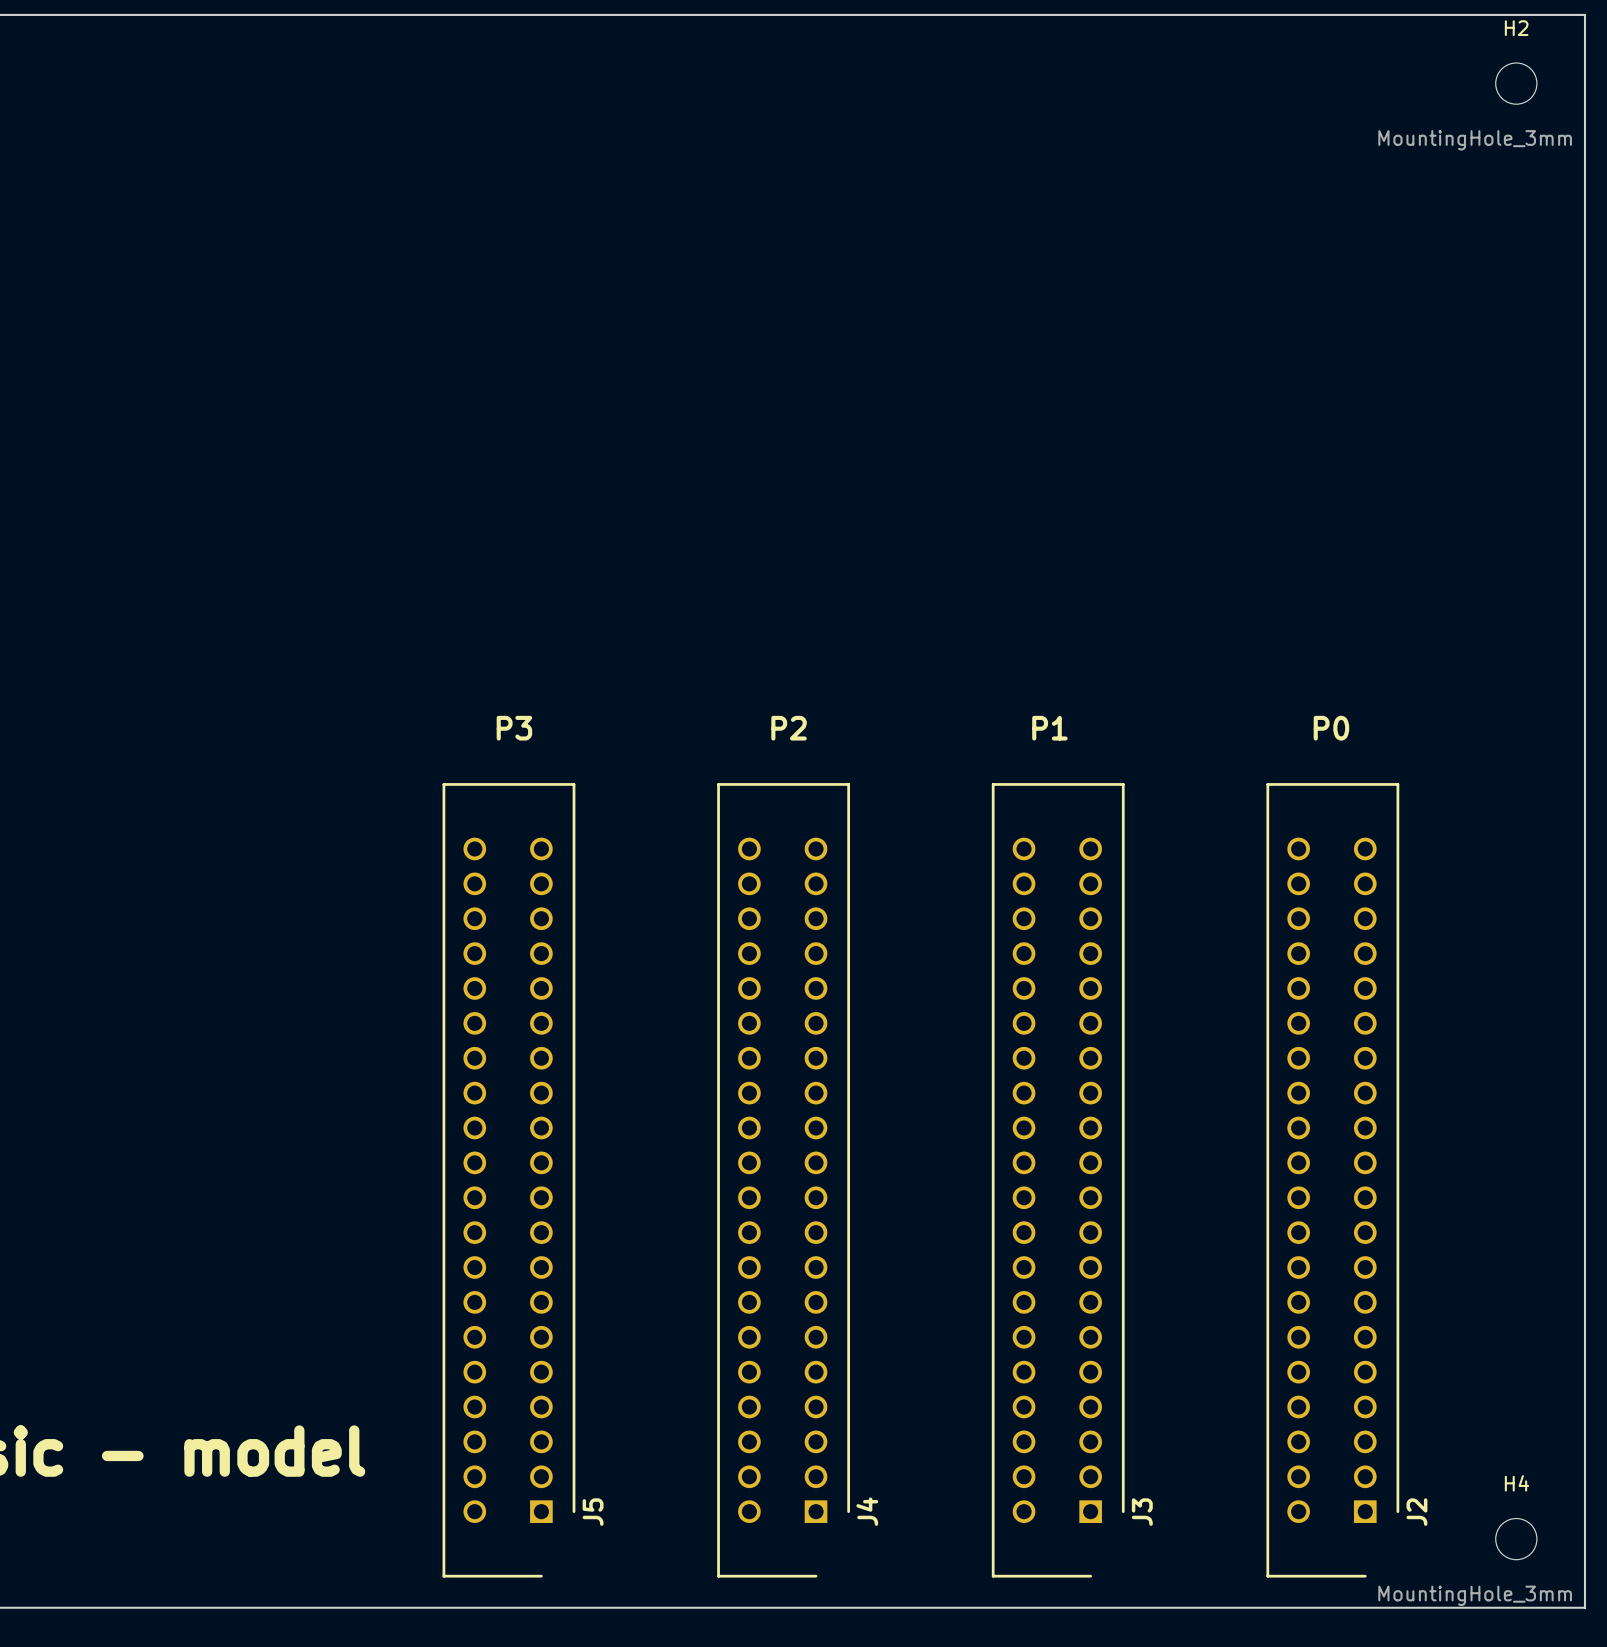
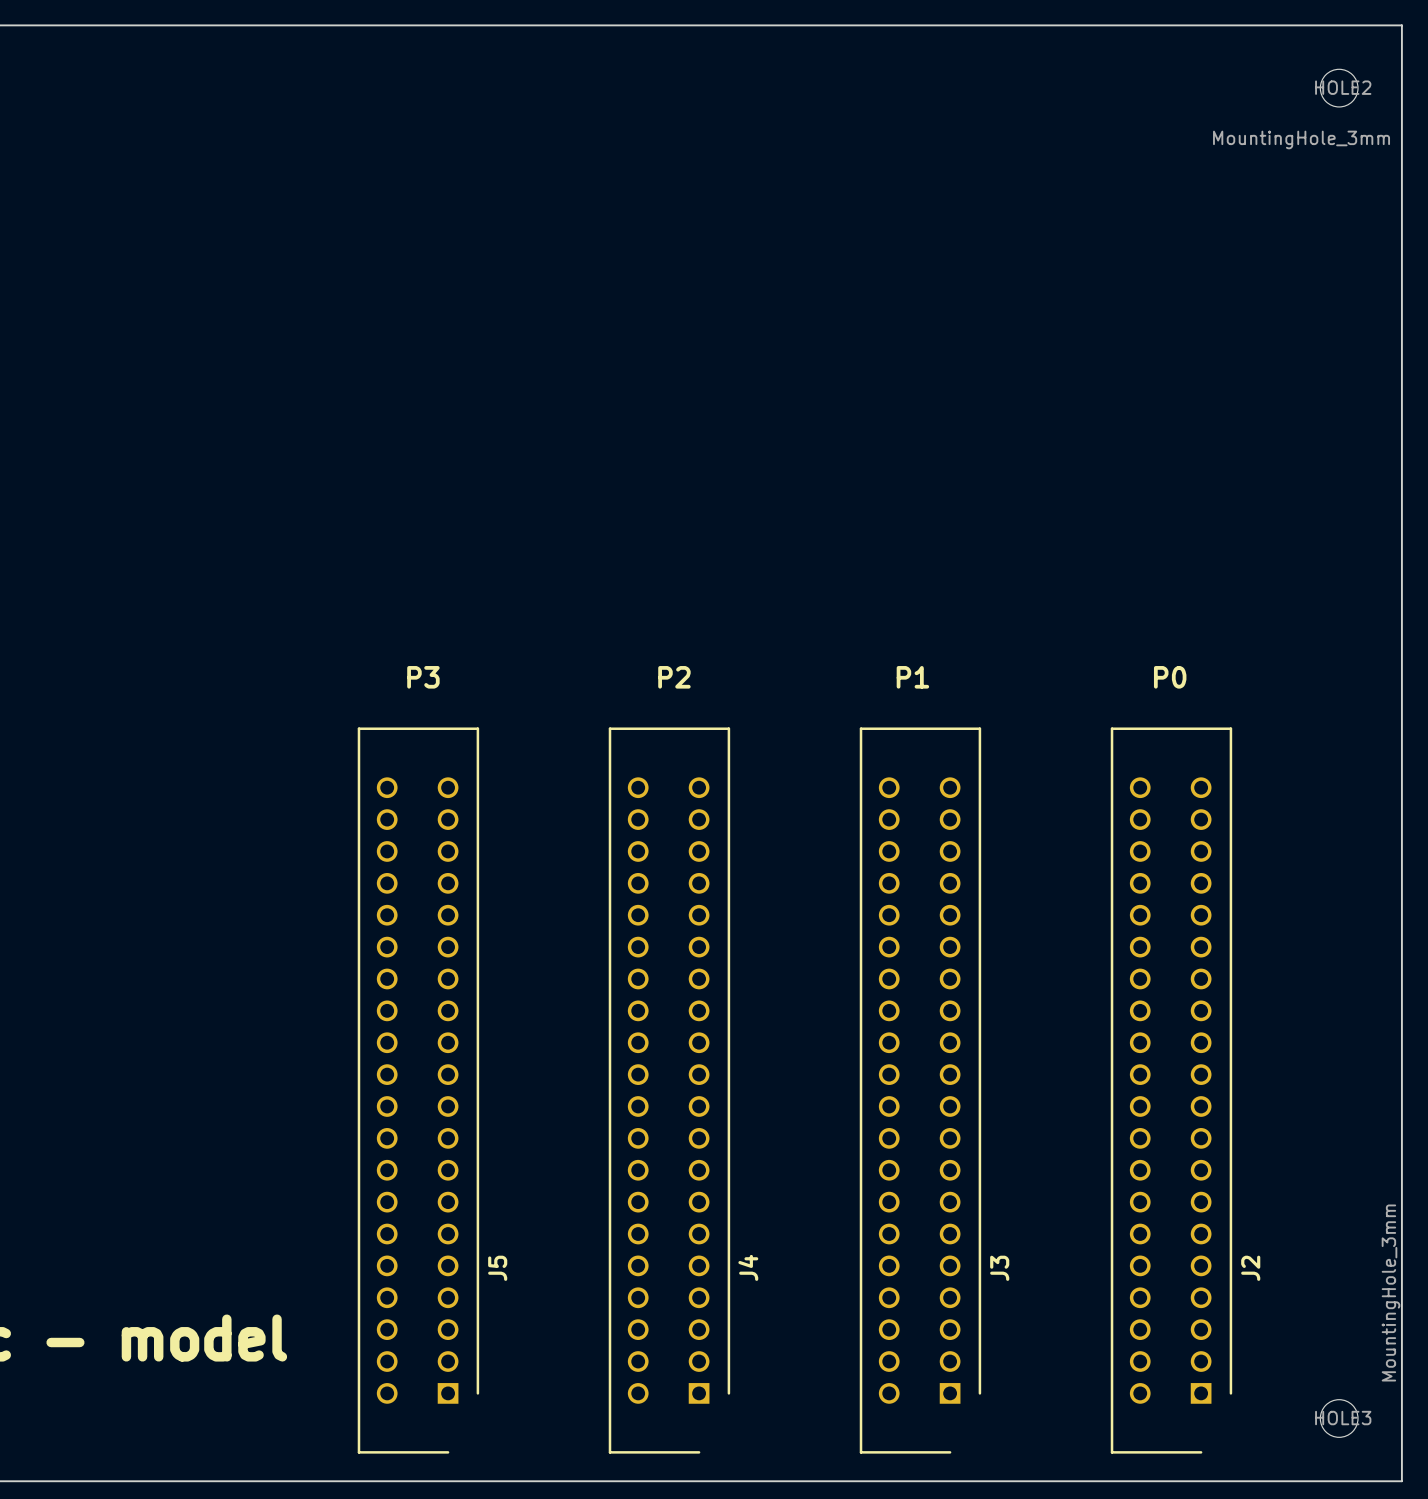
H2 name: H2 (1516, 28) -> HOLE2 (1343, 87)
H4 name: H4 (1516, 1483) -> HOLE3 (1343, 1418)
J4 name position: J4 (867, 1511) -> J4 (748, 1267)
J5 name position: J5 (593, 1512) -> J5 (497, 1268)
J3 name position: J3 (1142, 1512) -> J3 (999, 1268)
J2 name position: J2 (1416, 1512) -> J2 (1250, 1268)
H4 value rotation: 0° (1475, 1595) -> 90° counterclockwise (1391, 1292)

